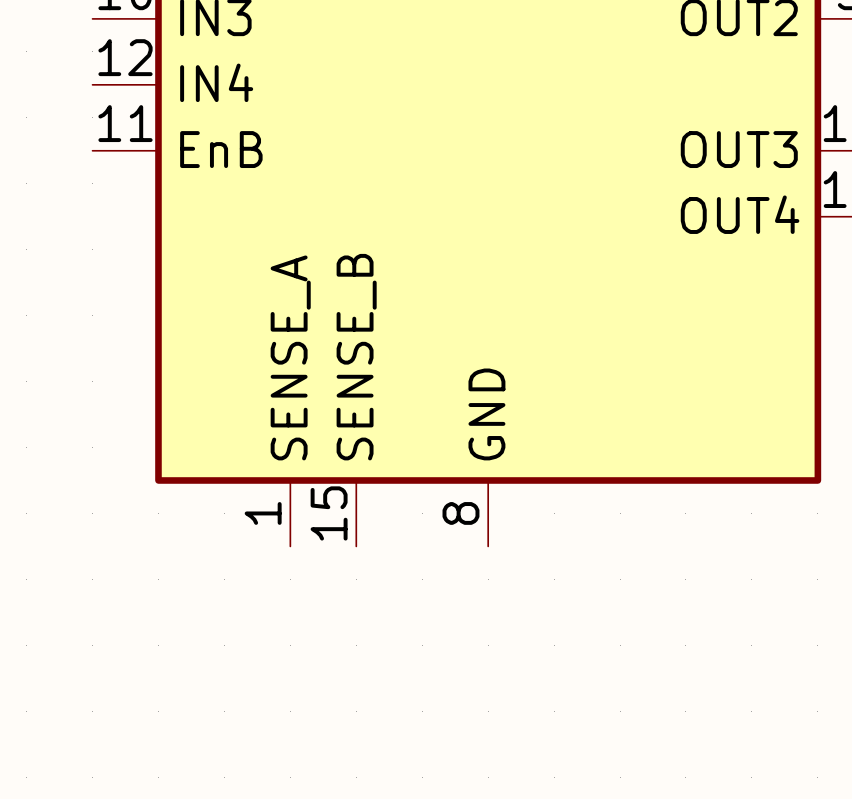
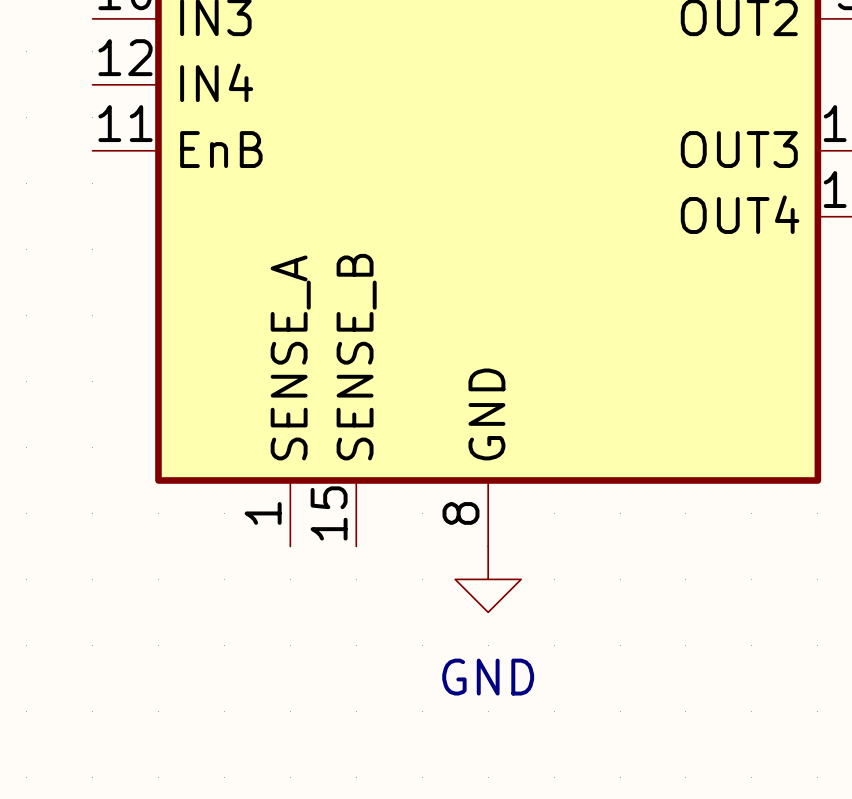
power symbol: none -> GND (488, 579)

